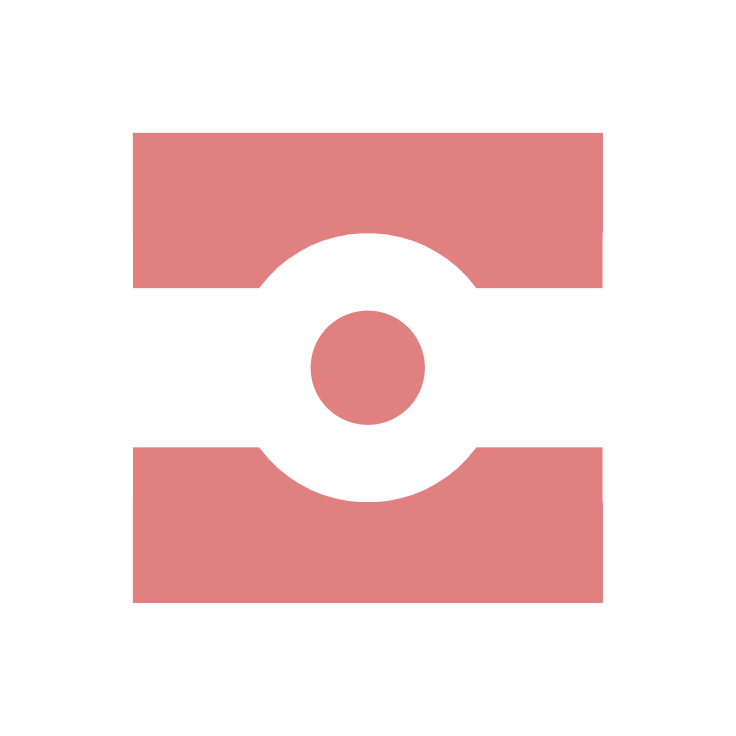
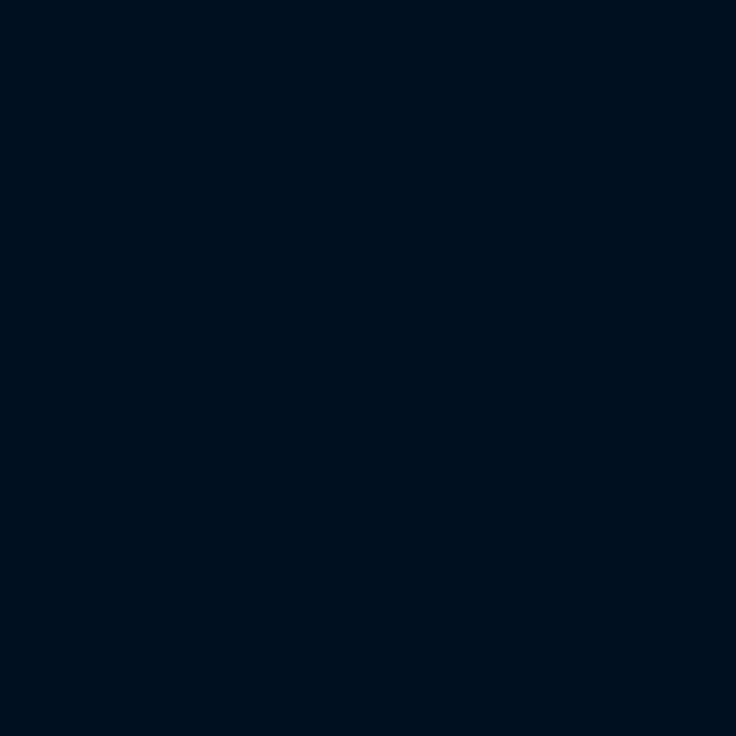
part: (367, 367) -> none

